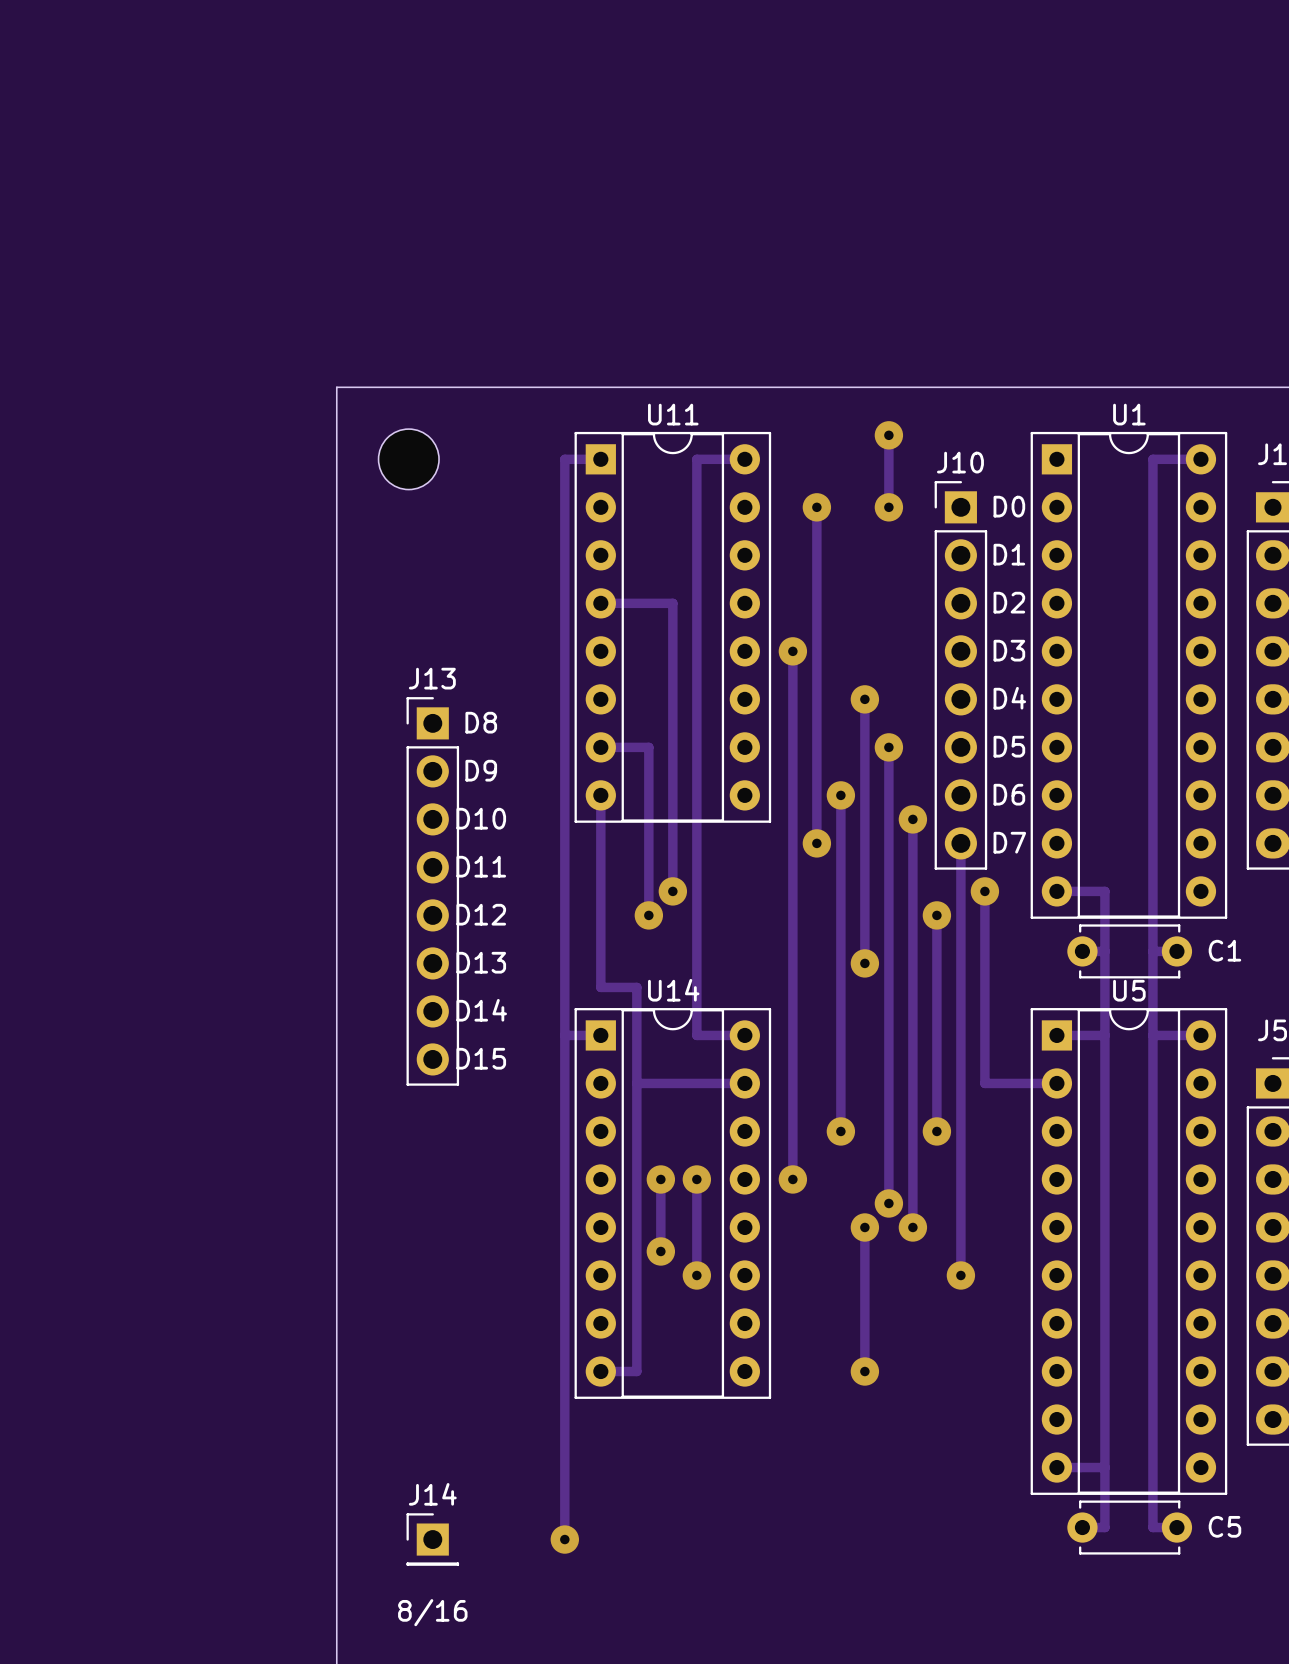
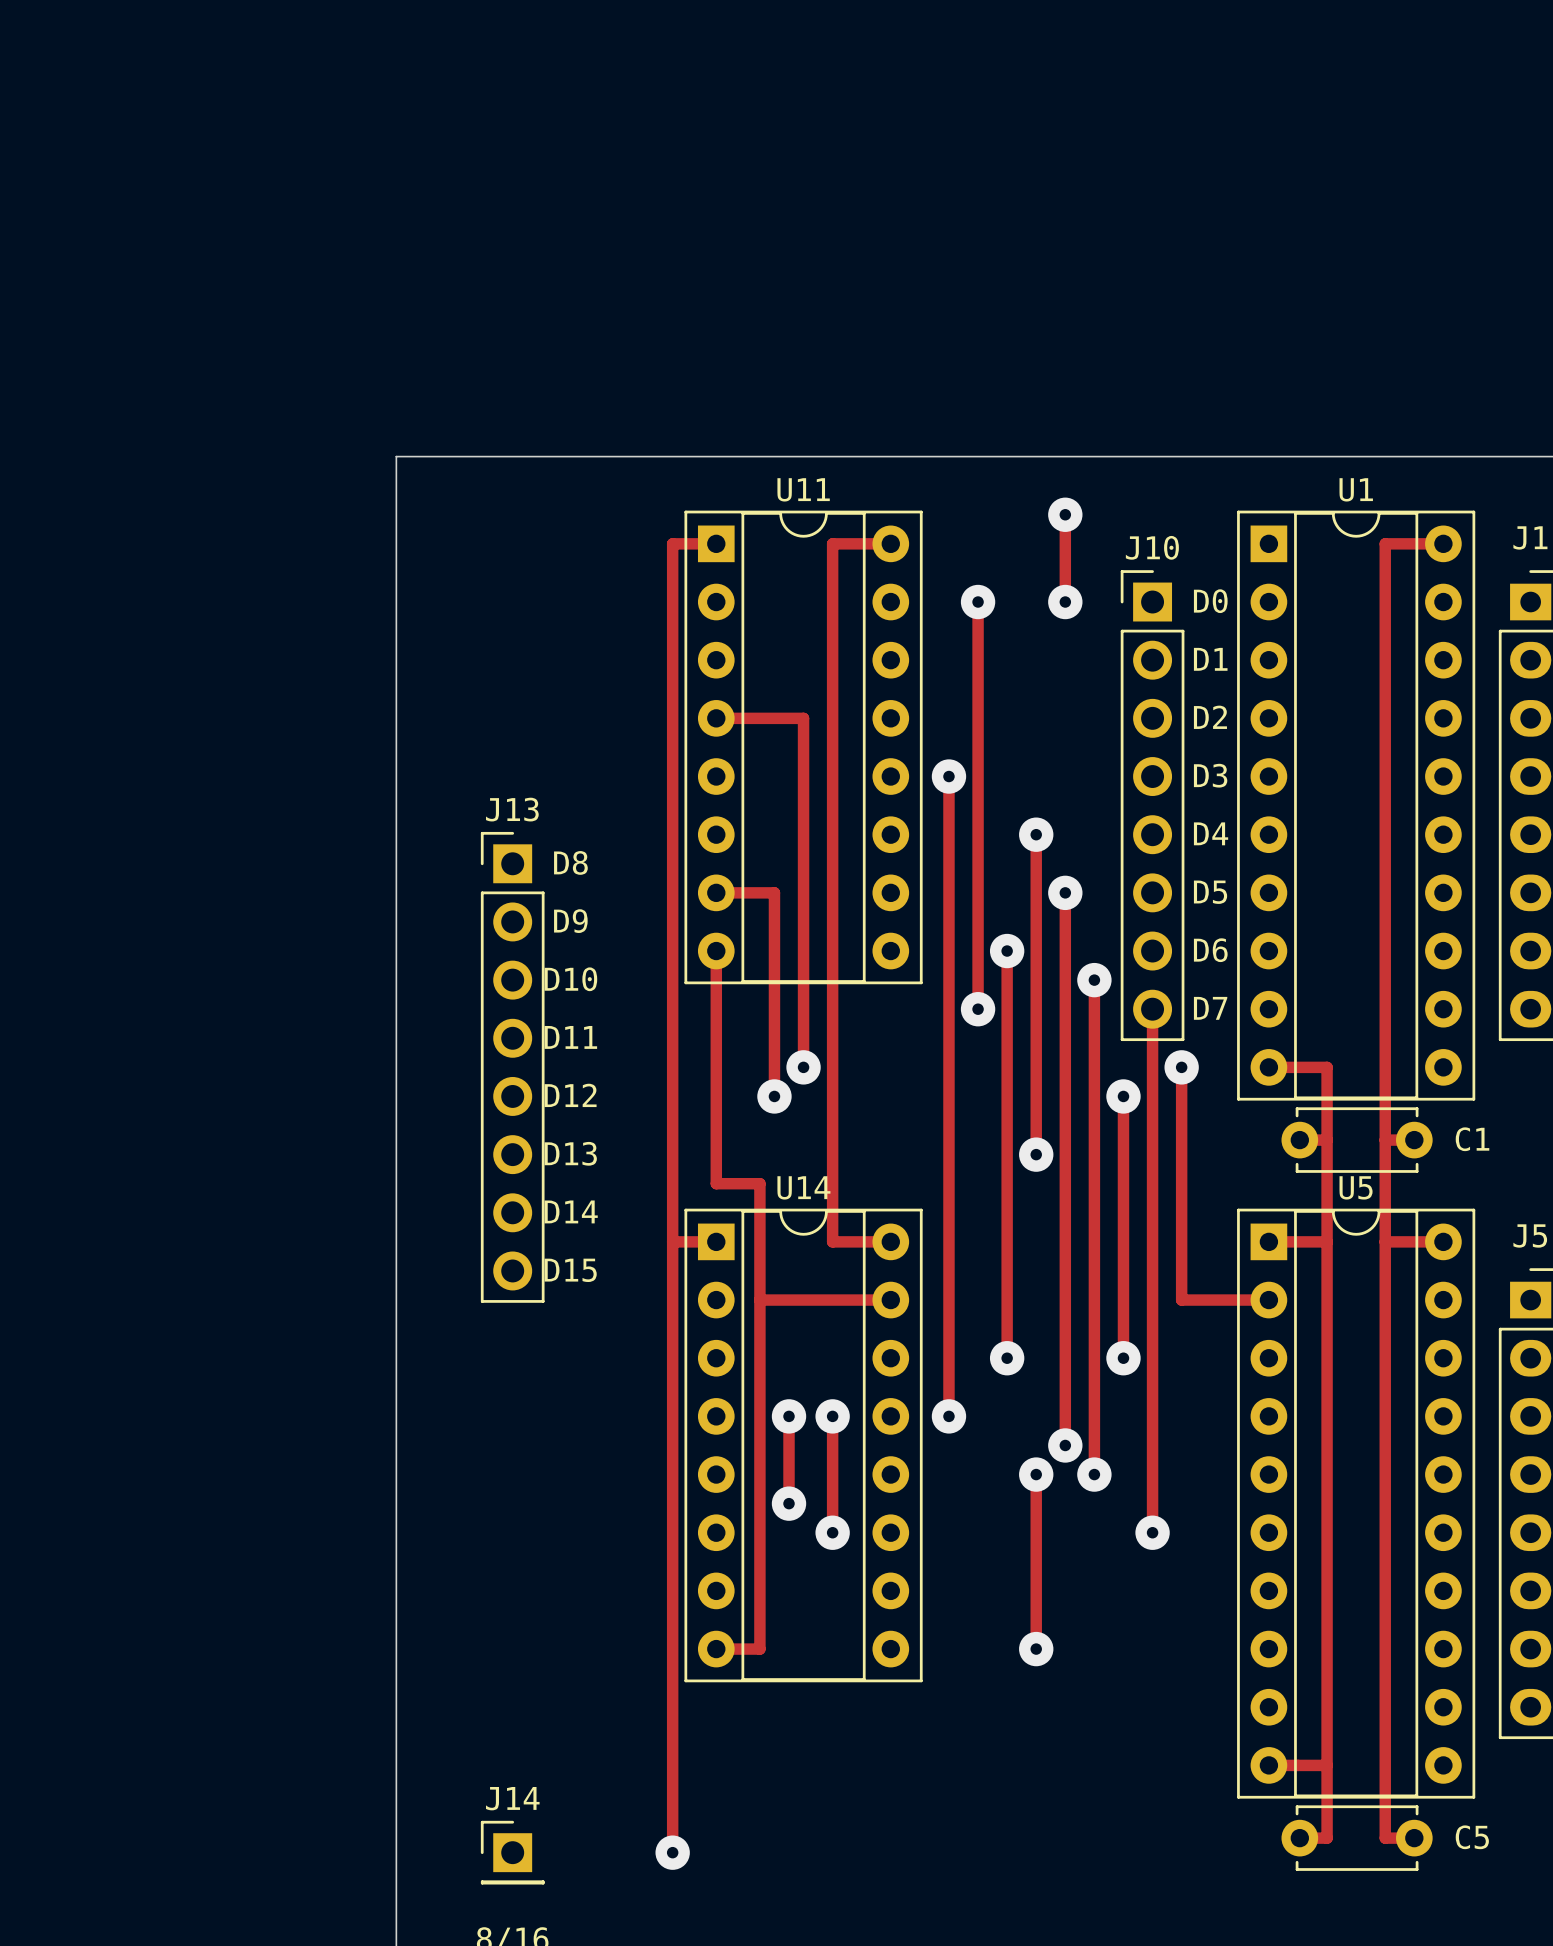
part: (408, 459) -> none

